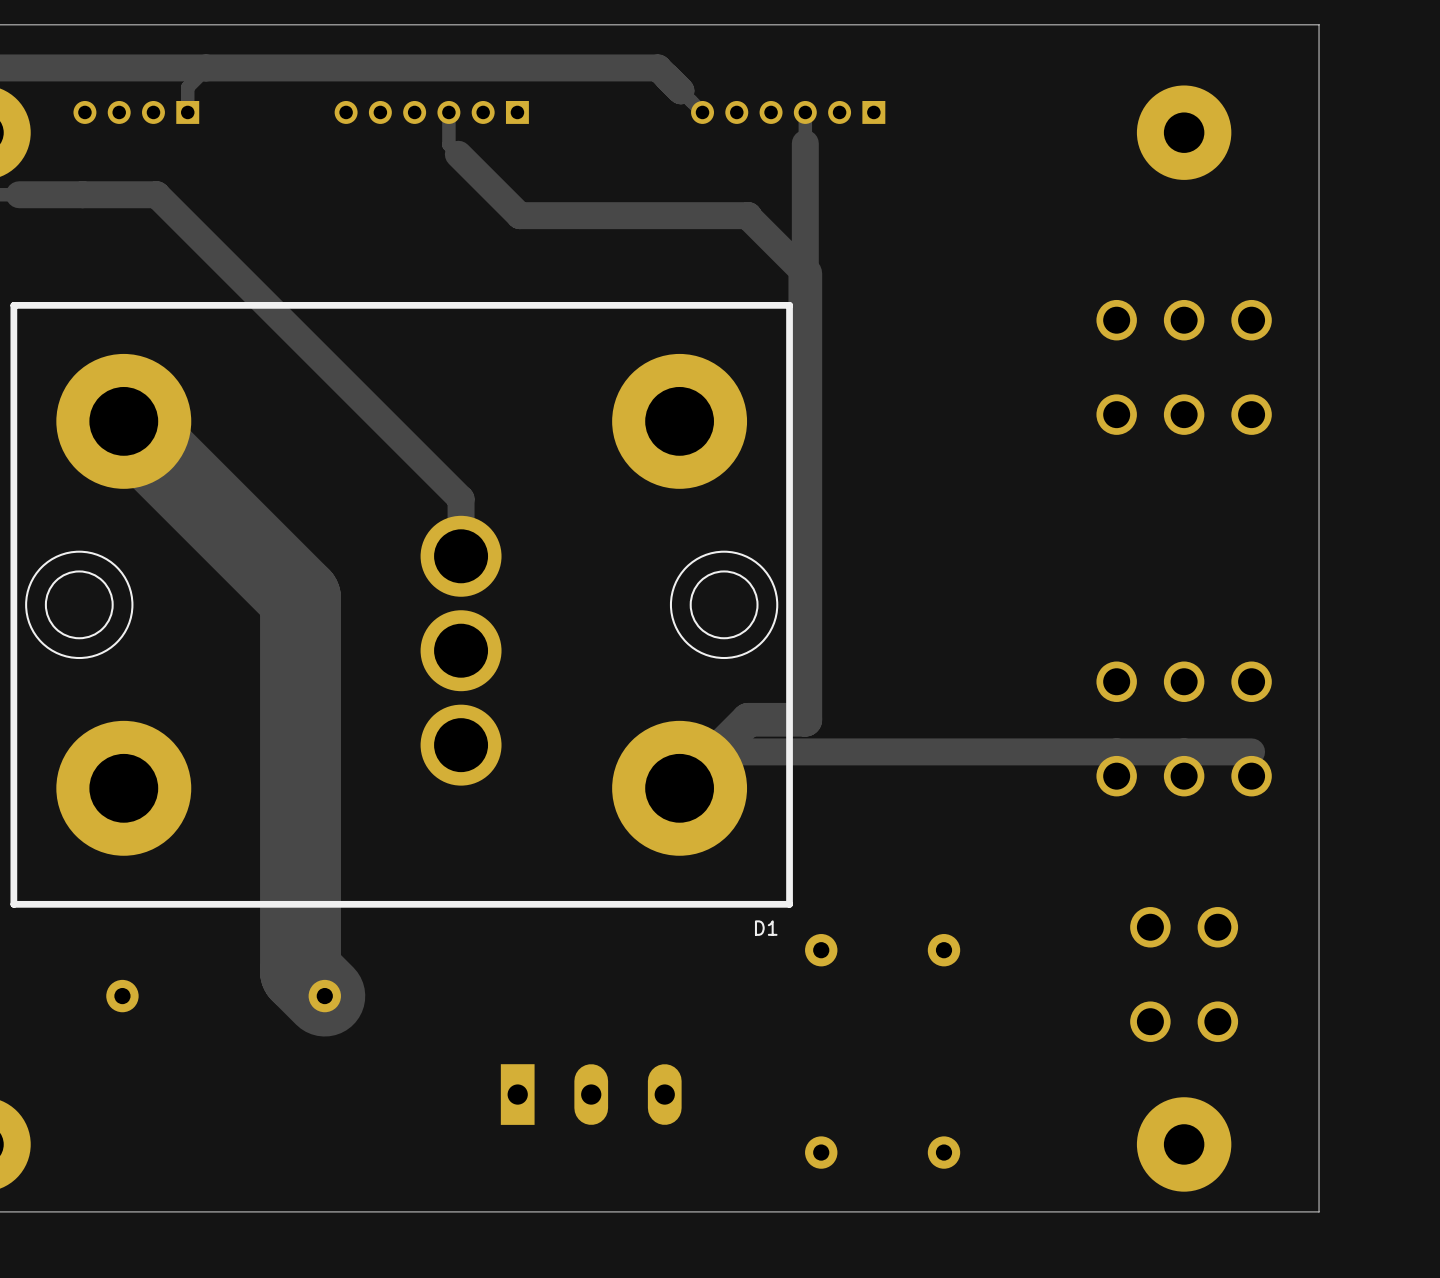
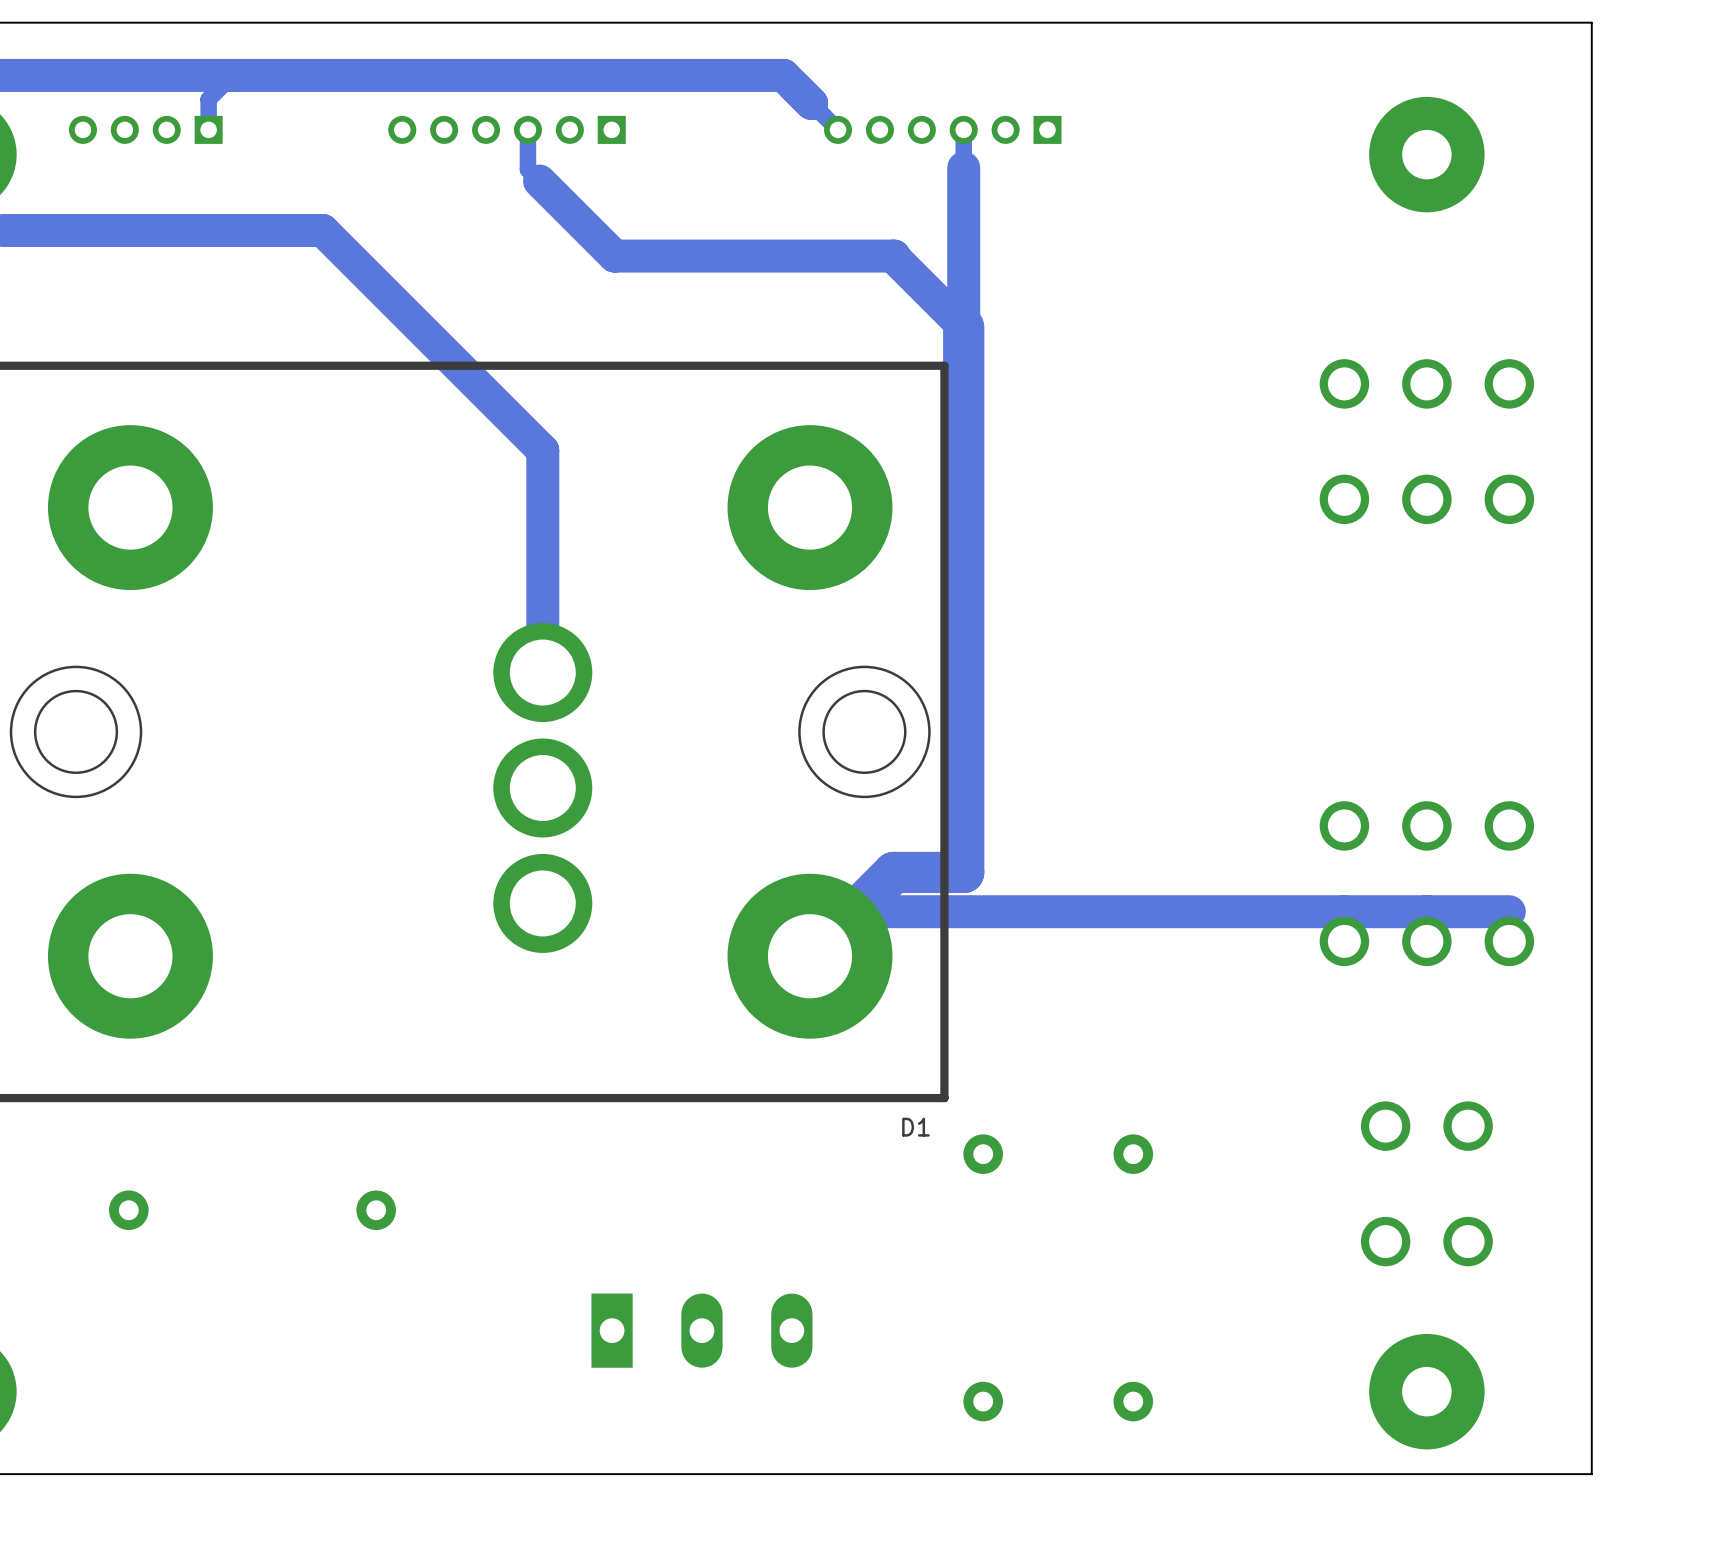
track: (156, 194) (461, 499) -> (170, 230) (322, 230) (542, 450) (542, 602)
track: (123, 421) (300, 598) (300, 971) (324, 996) -> none

